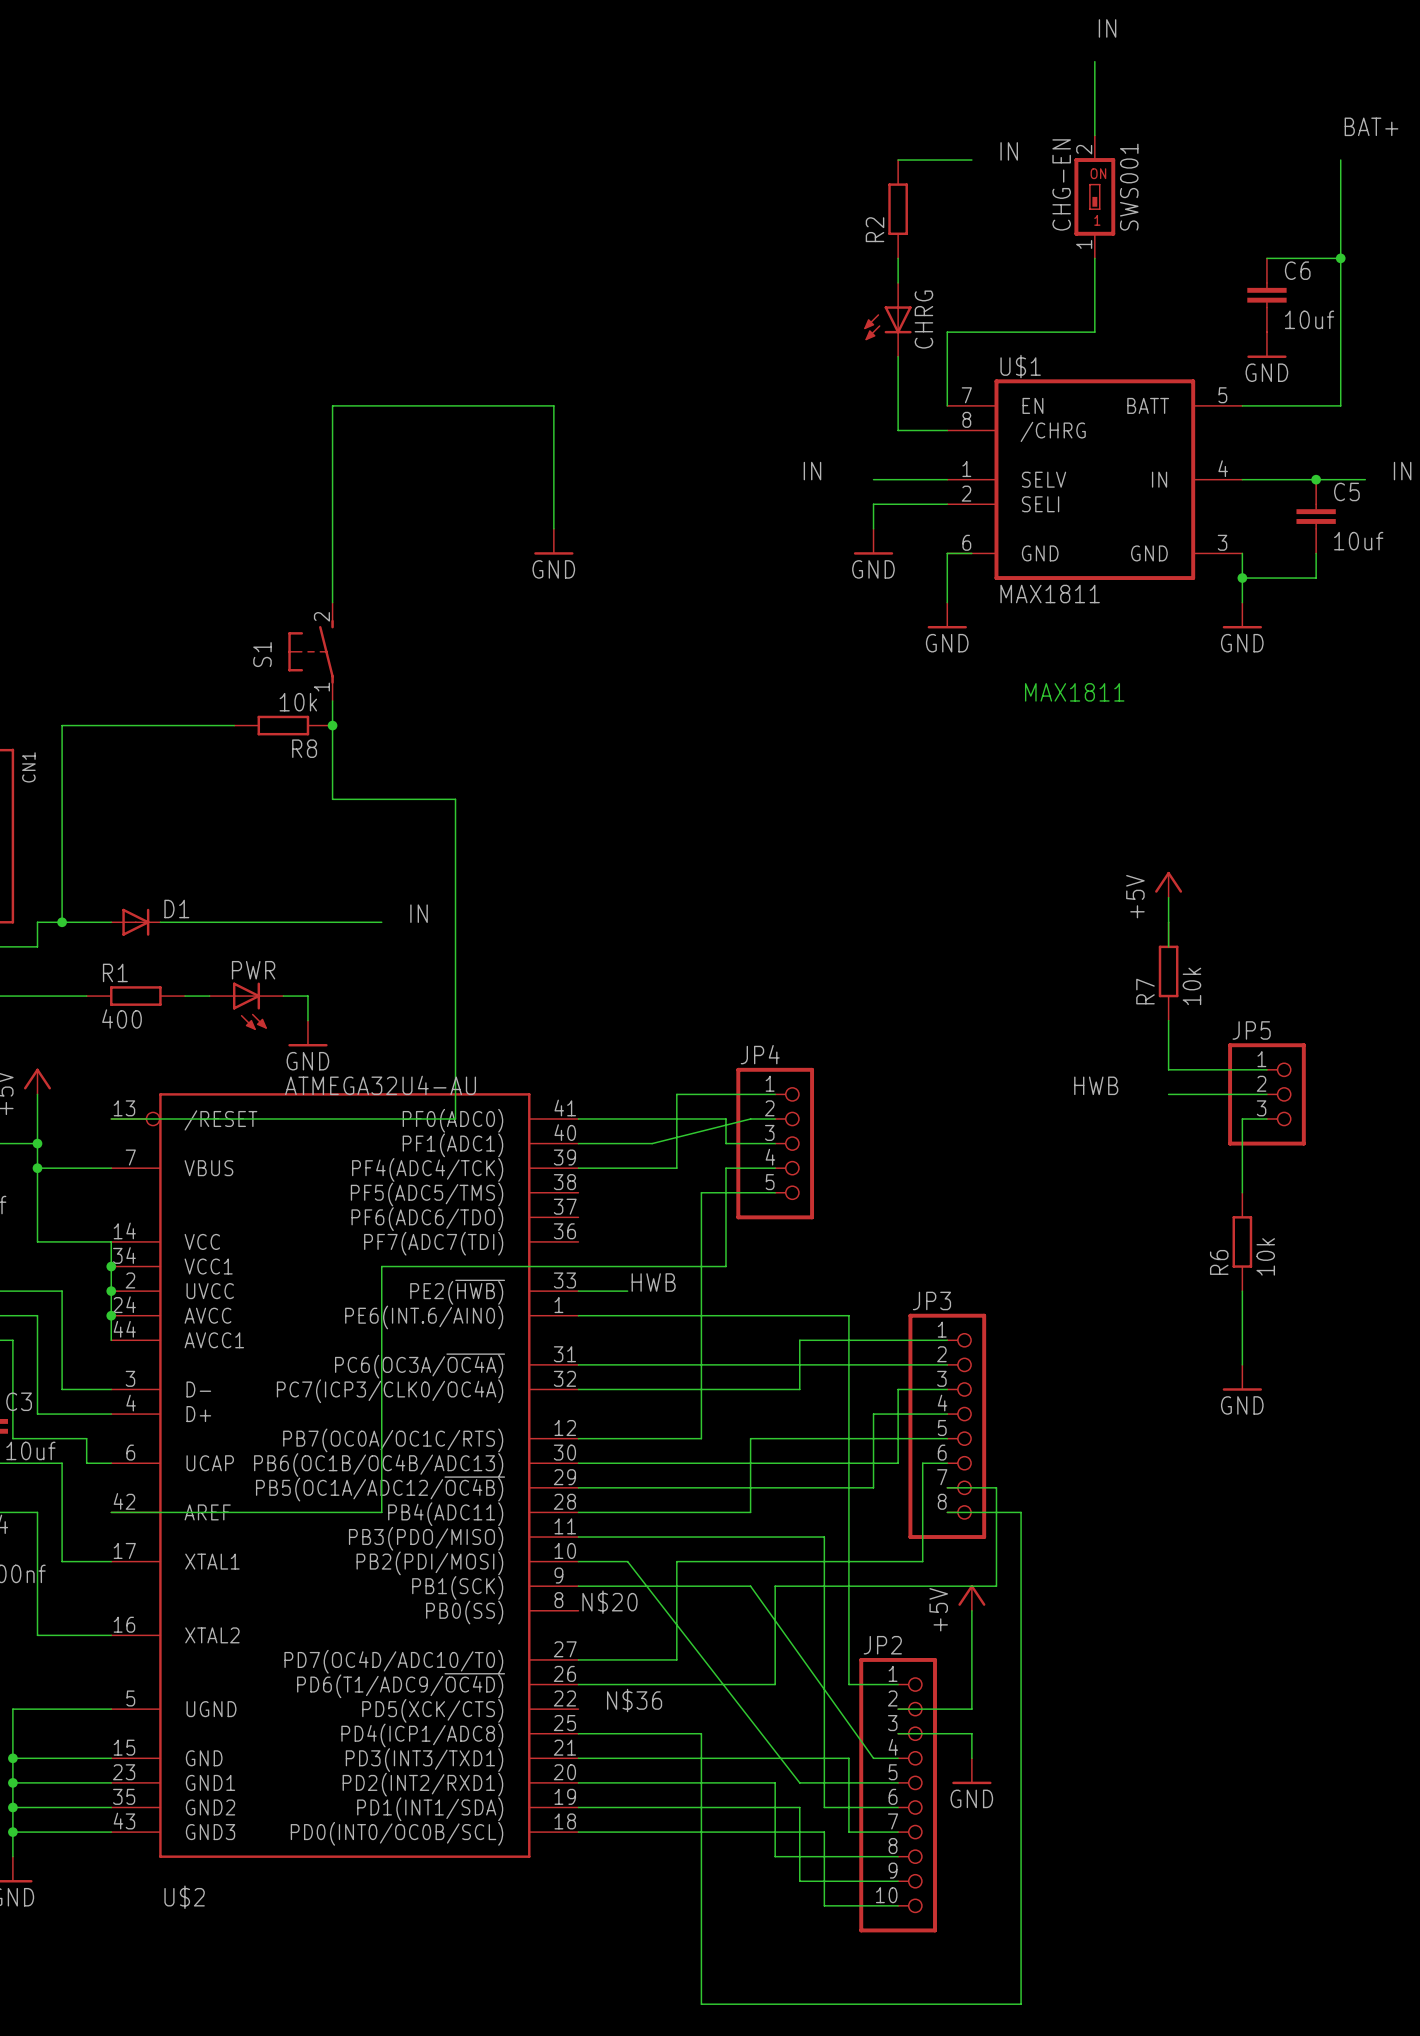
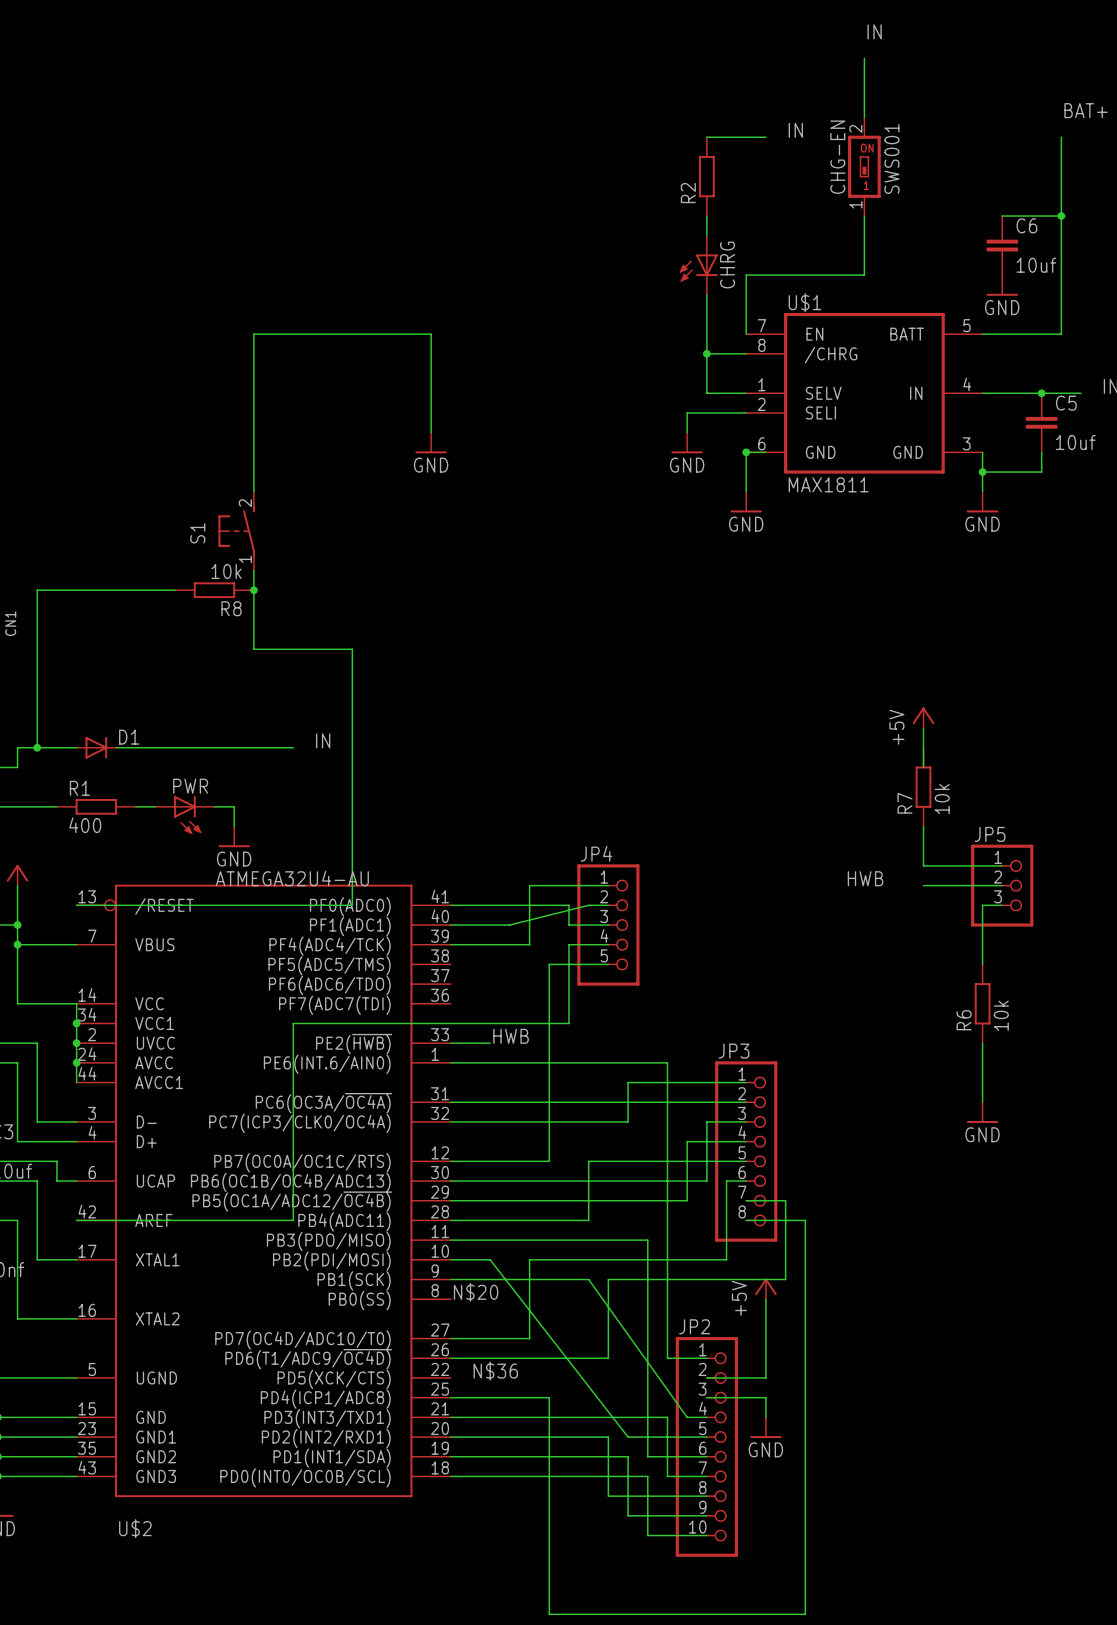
junction: none -> (706, 353)
label: IN (812, 471) -> none
wire: (873, 479) (898, 479) -> (706, 353) (706, 393)
junction: none -> (746, 452)
text: MAX1811 (1074, 692) -> none

